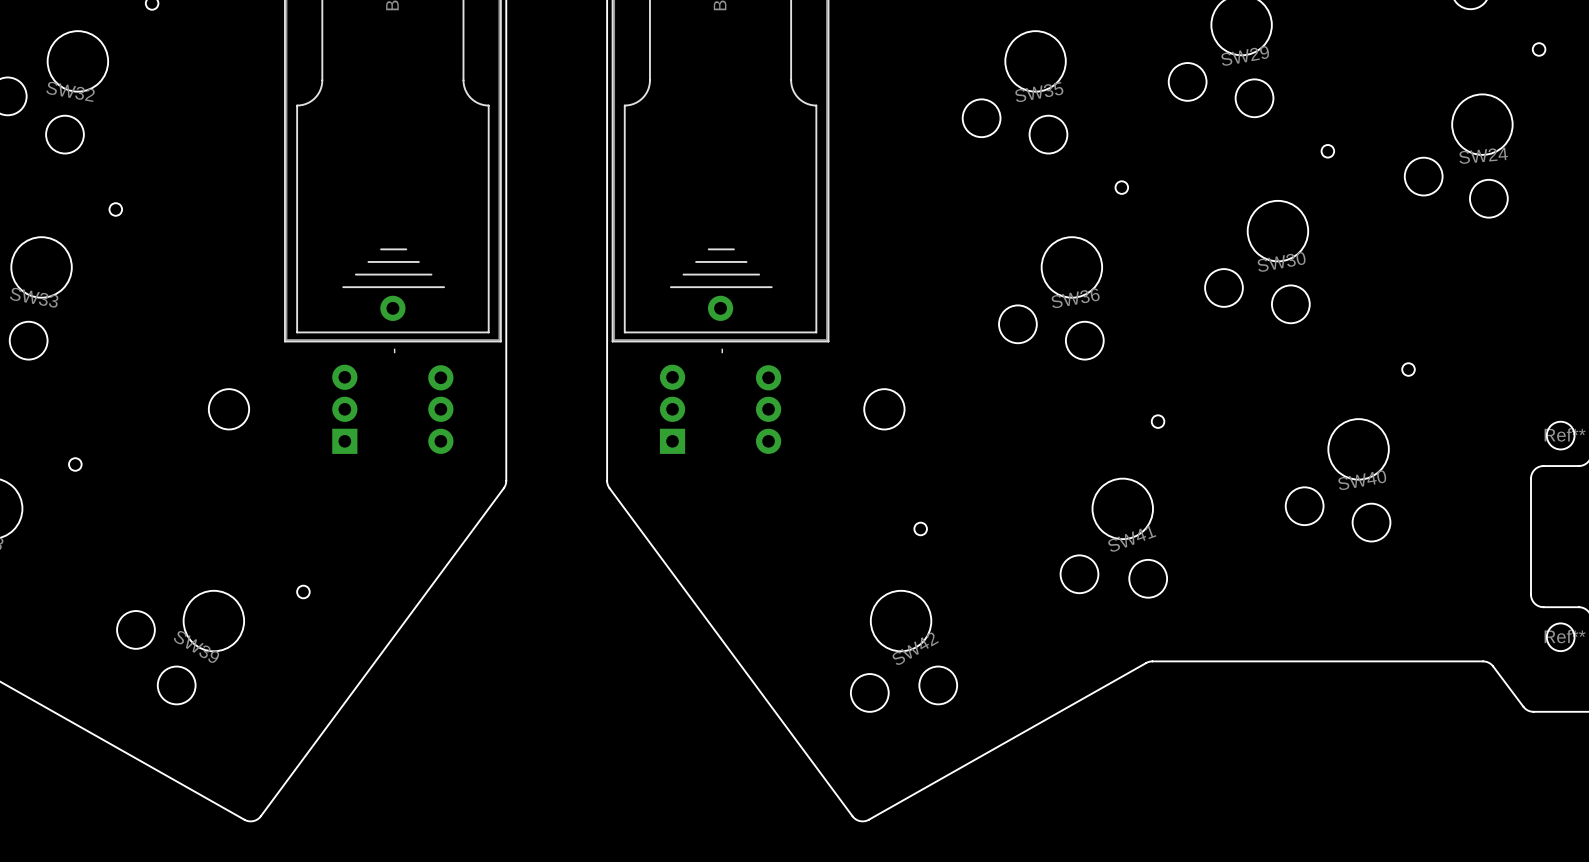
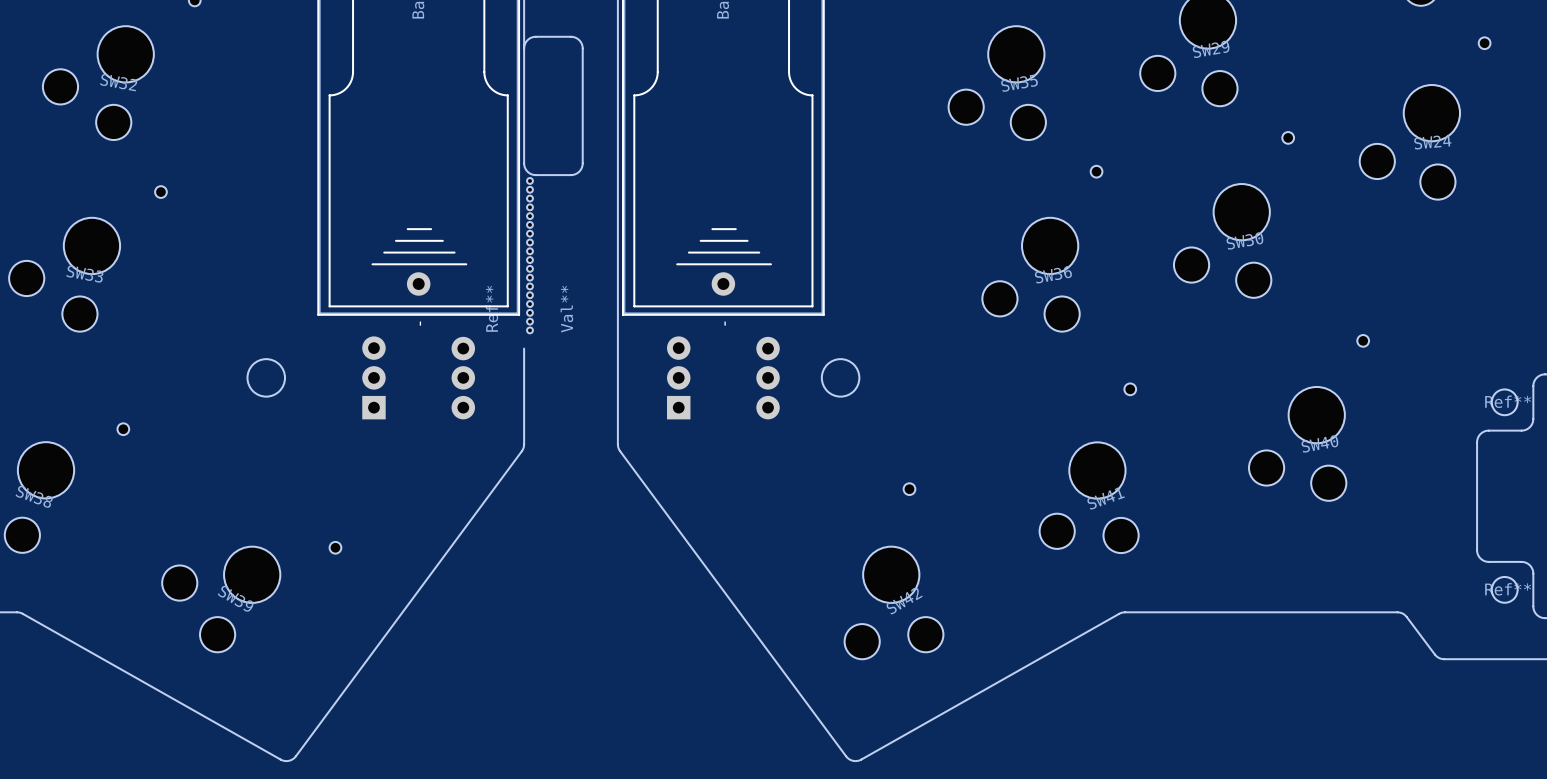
board edge: (506, 178) (506, 377) -> (524, 163) (527, 171) (535, 175) (573, 174) (580, 170) (582, 163) (581, 43) (572, 36) (534, 36) (526, 41) (524, 48)
part: none -> (529, 202)
part: none -> (529, 255)
Ref**: none -> Val** (529, 308)
drawing position: (884, 409) -> (840, 377)
board edge: (1445, 661) (1488, 662) (1524, 707) (1533, 711) -> (1397, 612) (1405, 615) (1439, 657) (1479, 659)

